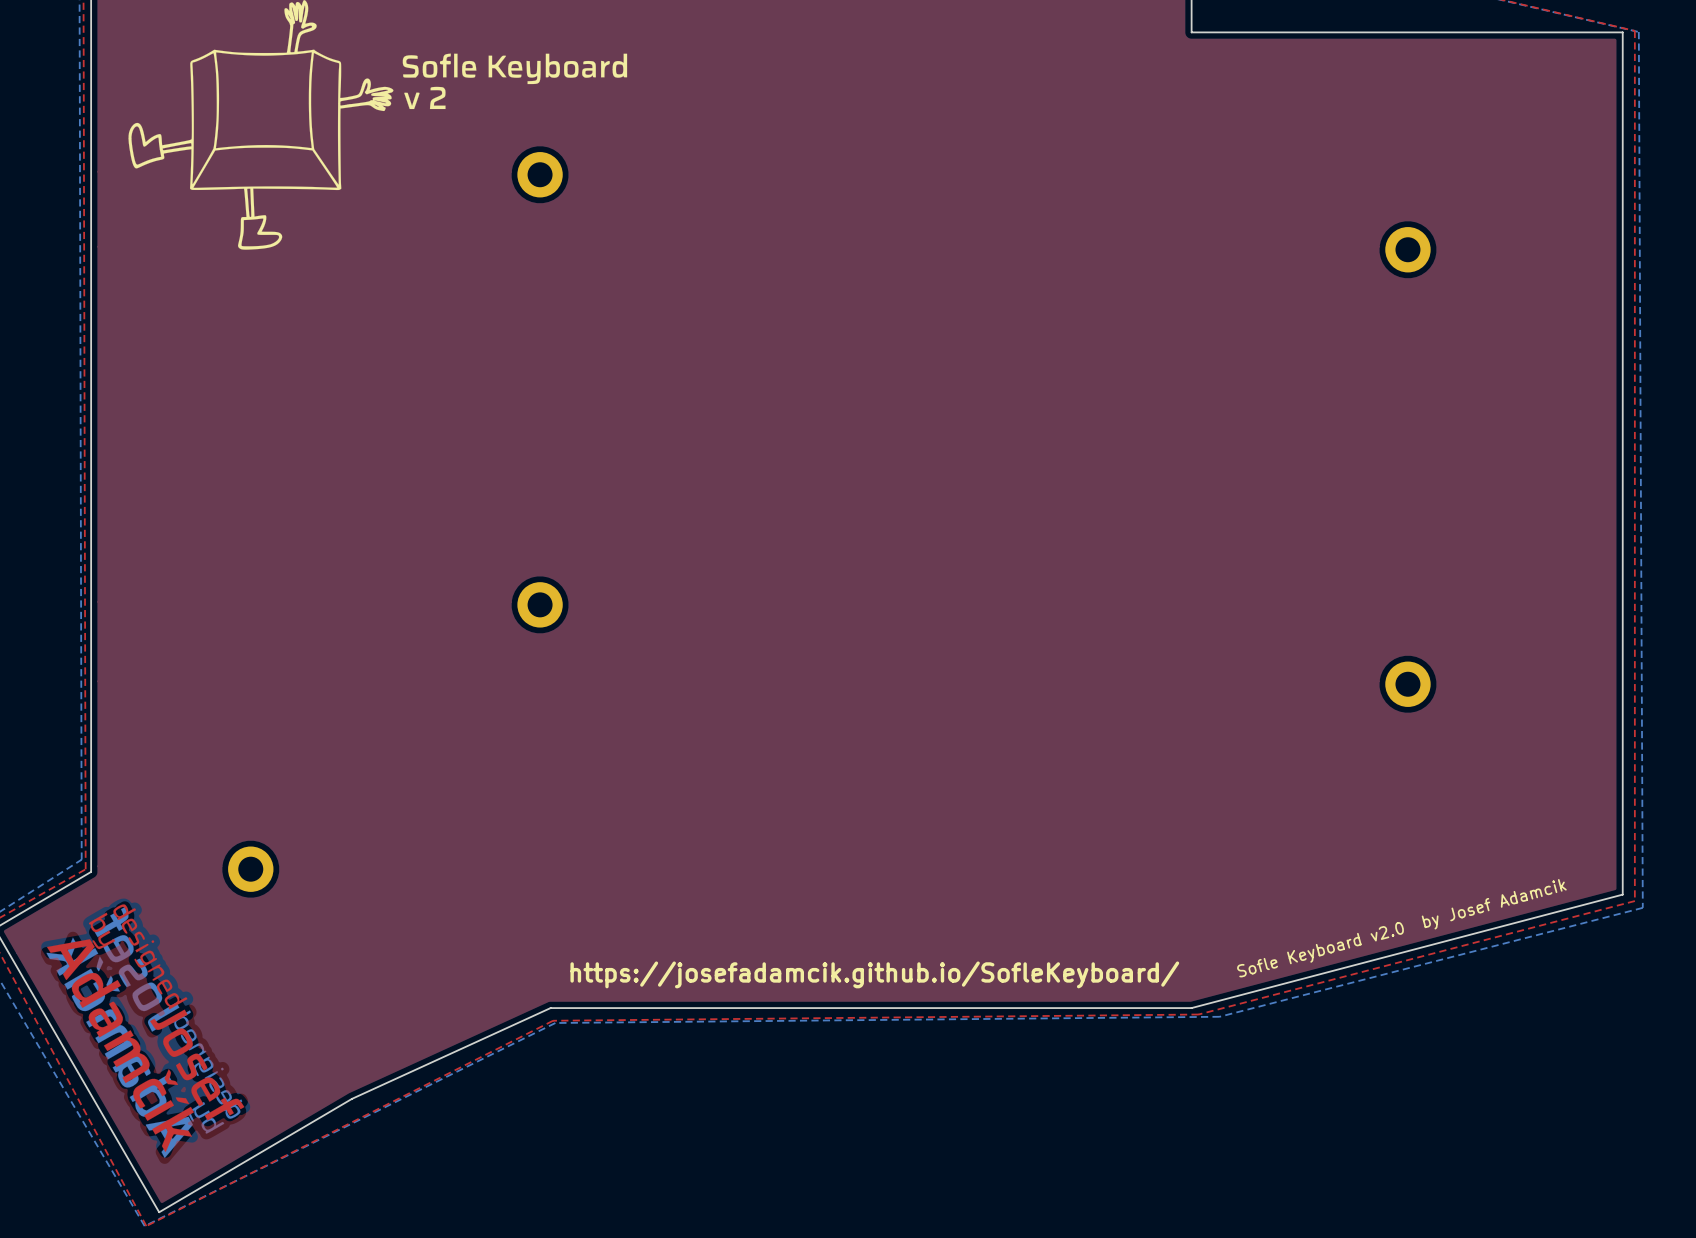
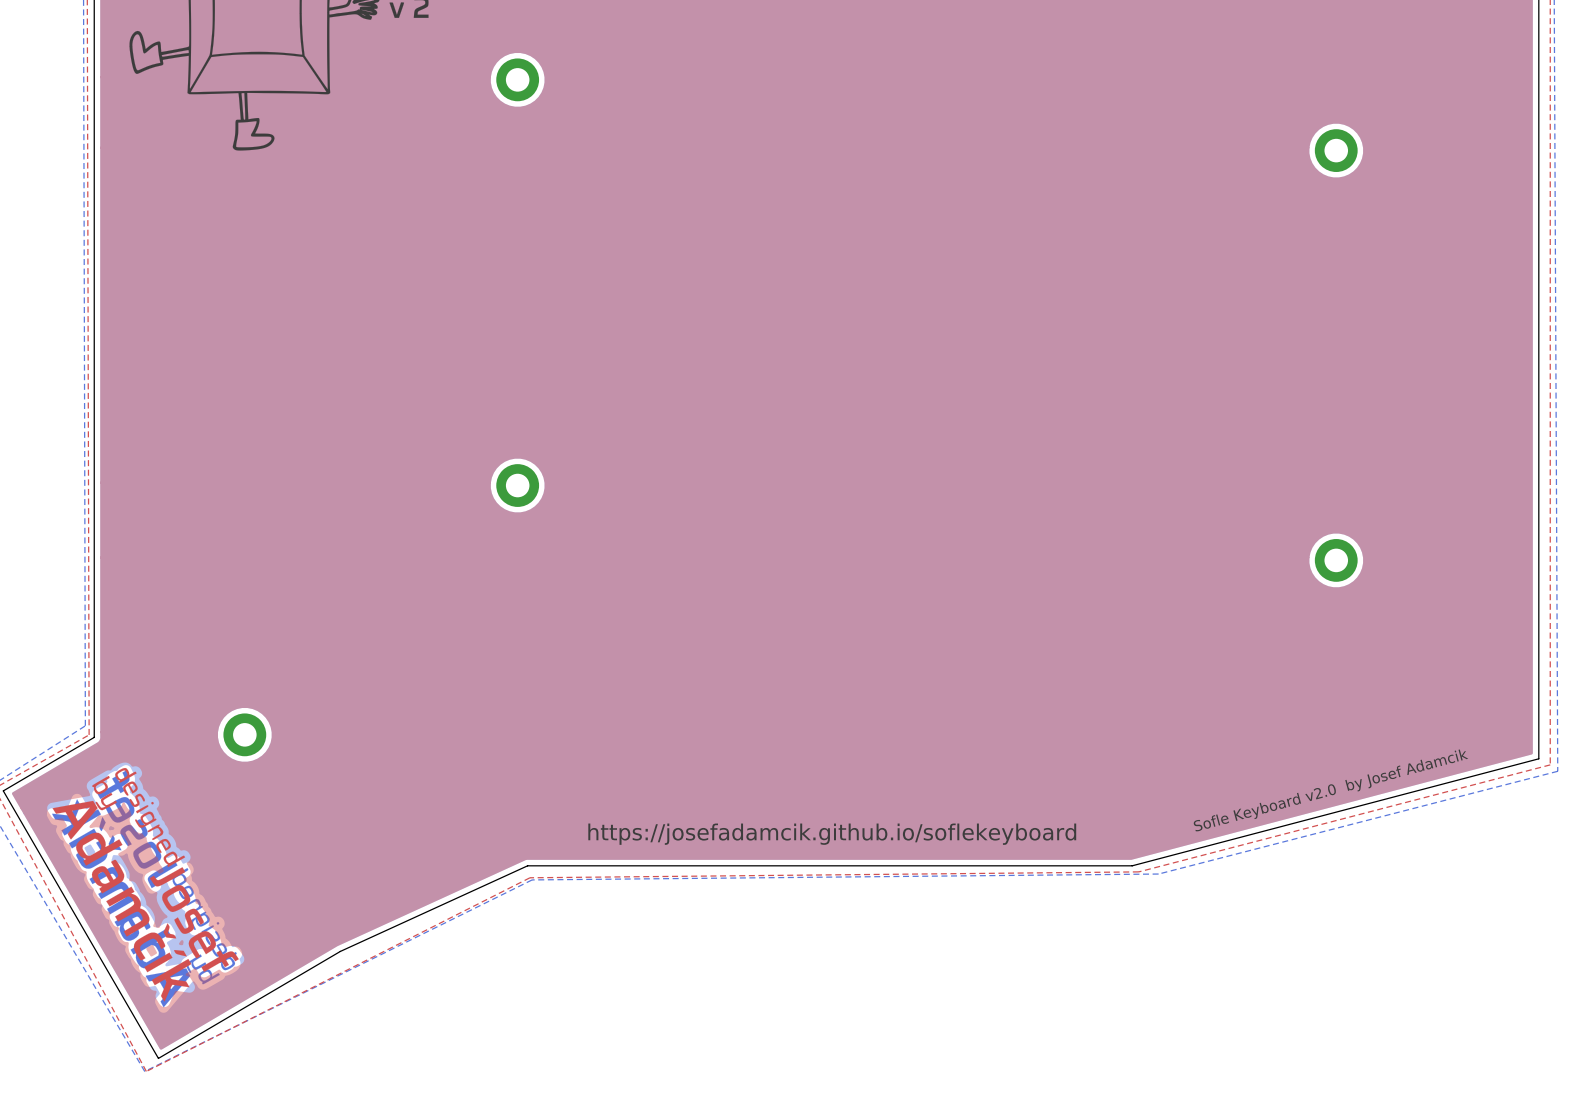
text: https://josefadamcik.github.io/SofleKeyboard/ (874, 974) -> https://josefadamcik.github.io/soflekeyboard (832, 834)

